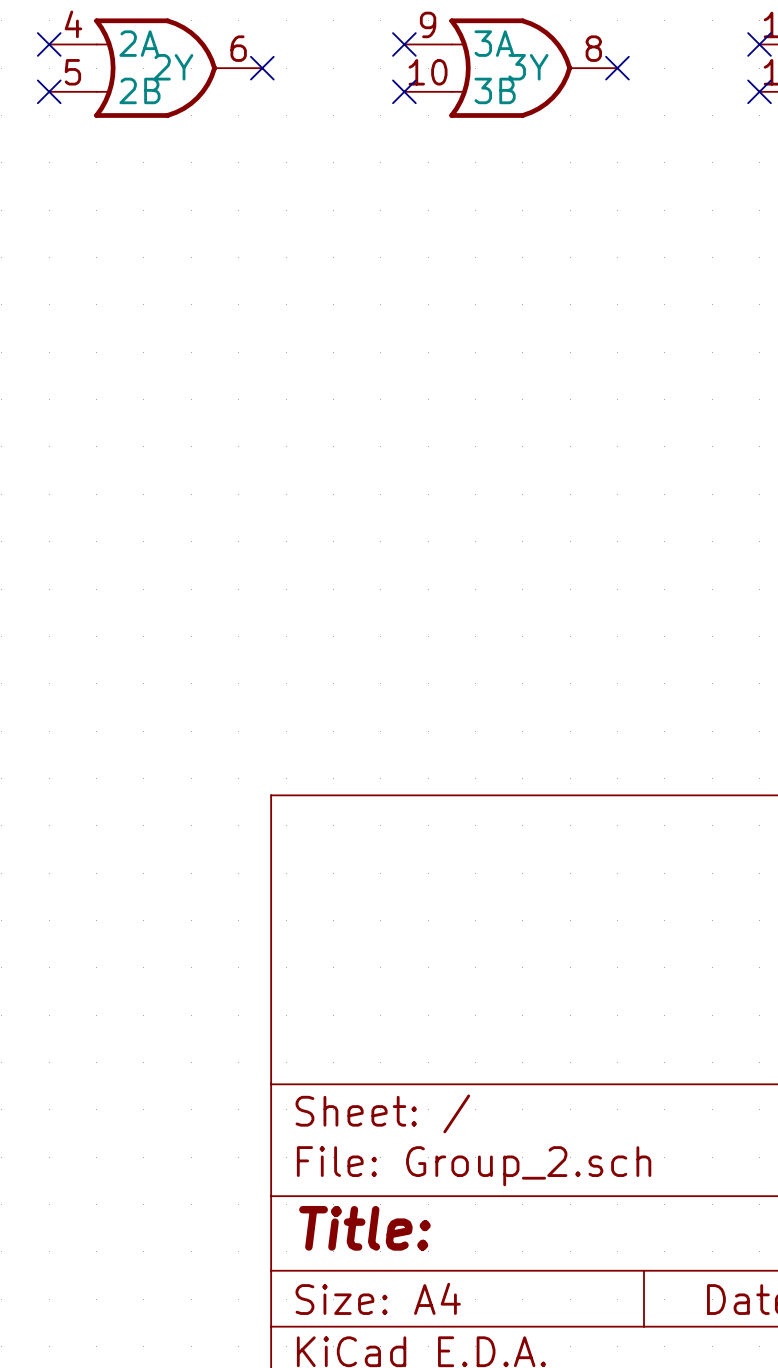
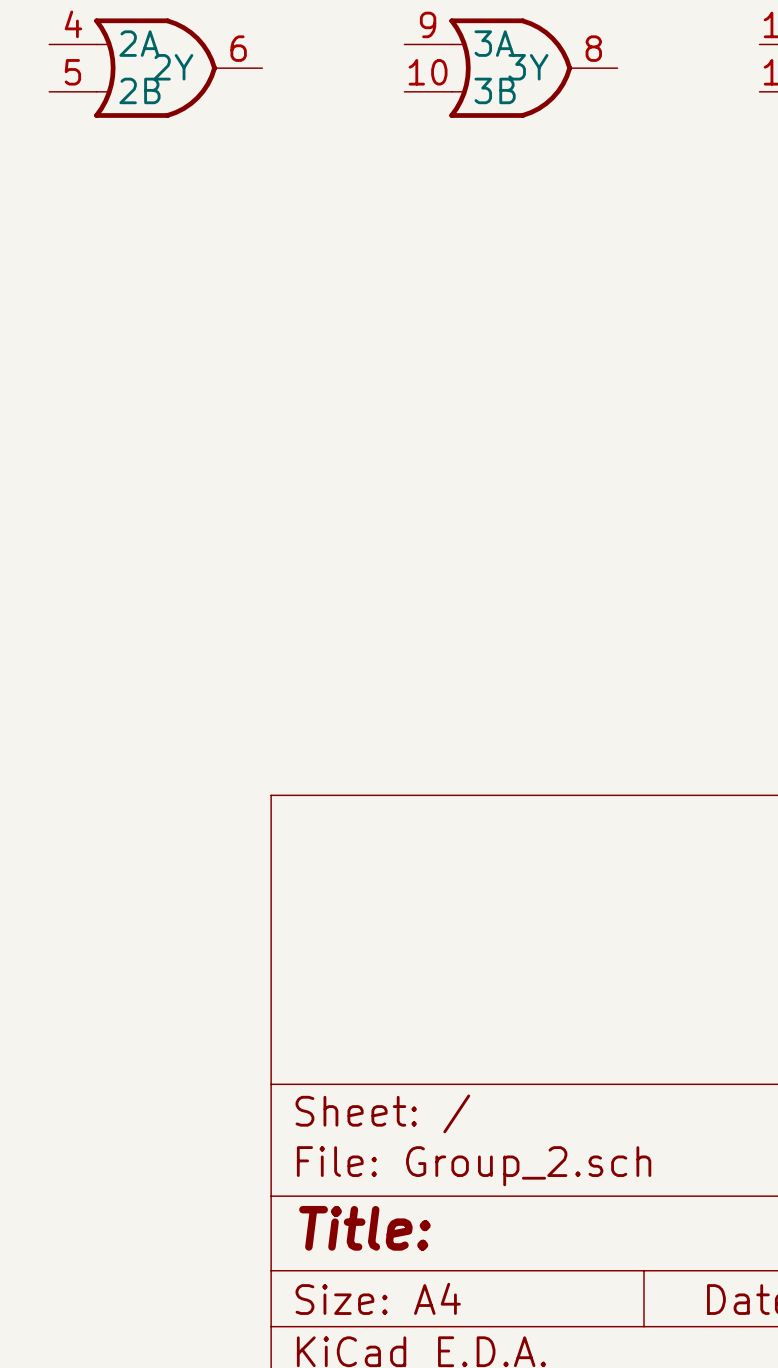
no-connect mark: (49, 44) -> none
no-connect mark: (404, 44) -> none
no-connect mark: (759, 44) -> none
no-connect mark: (262, 68) -> none
no-connect mark: (617, 68) -> none
no-connect mark: (49, 91) -> none
no-connect mark: (404, 91) -> none
no-connect mark: (759, 91) -> none

